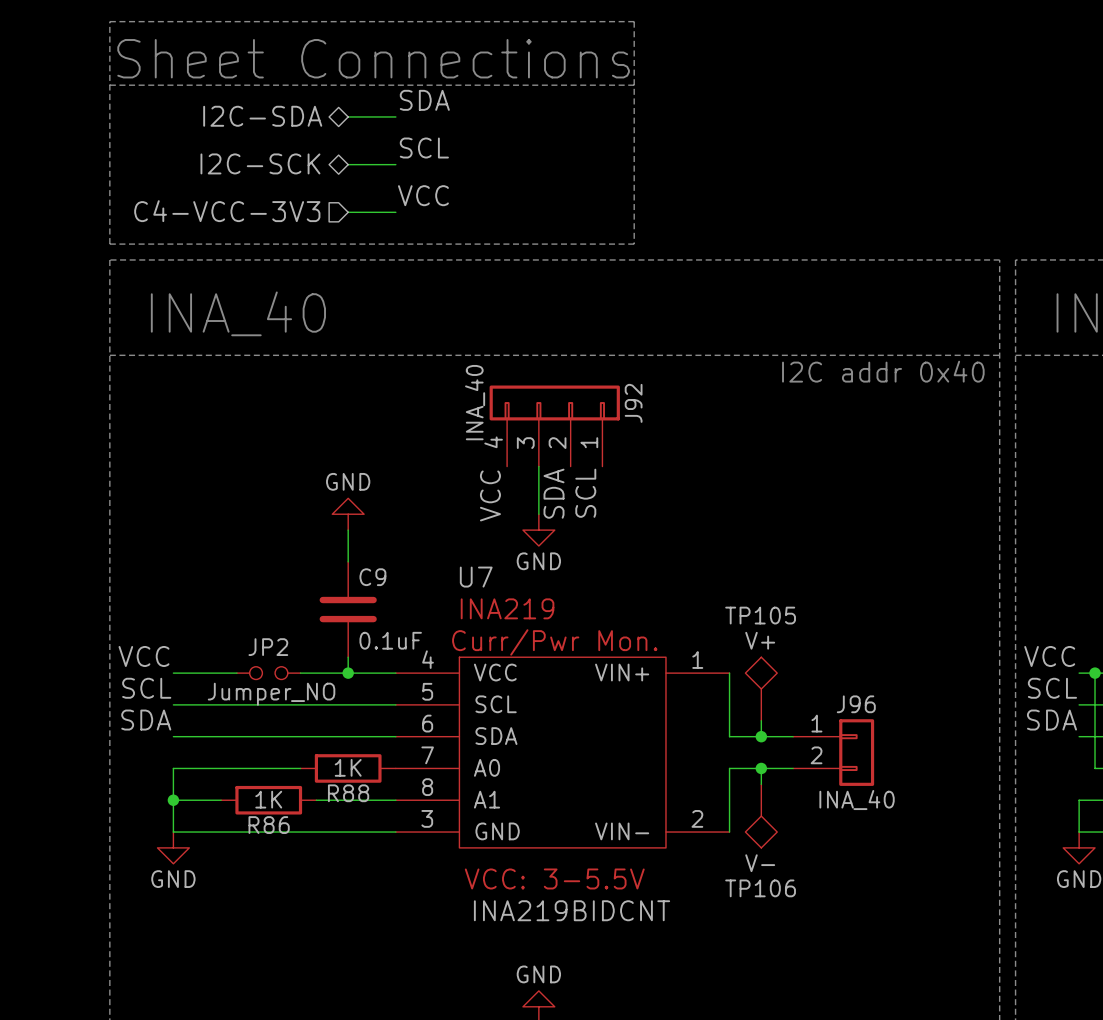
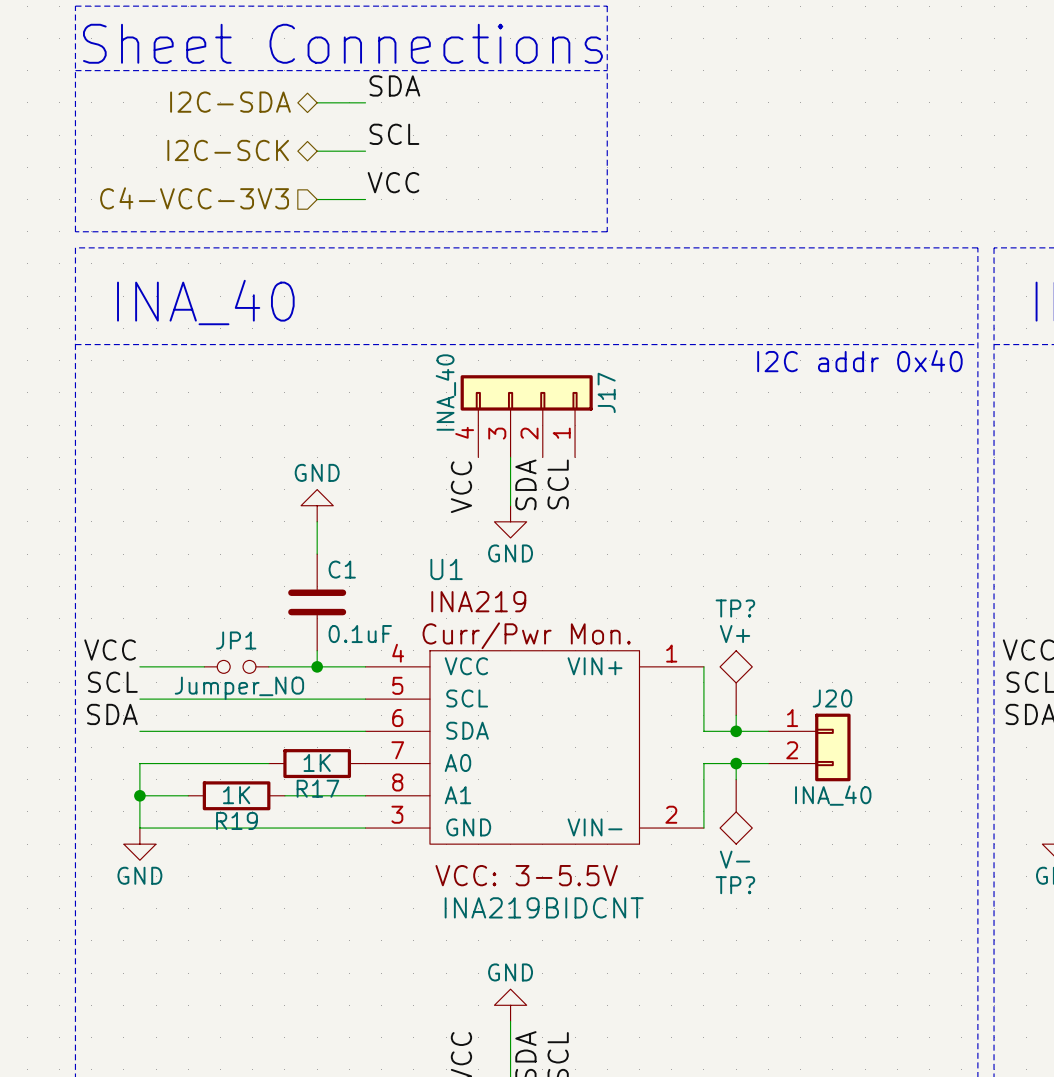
J92 name: J92 (633, 403) -> J17 (606, 392)
C9 name: C9 (372, 577) -> C1 (342, 569)
U7 name: U7 (476, 577) -> U1 (446, 569)
TP105 name: TP105 (760, 615) -> TP? (735, 608)
JP2 name: JP2 (268, 647) -> JP1 (236, 640)
J96 name: J96 (856, 704) -> J20 (832, 698)
R88 name: R88 (348, 793) -> R17 (317, 788)
R86 name: R86 (269, 825) -> R19 (236, 820)
TP106 name: TP106 (760, 888) -> TP? (735, 885)

